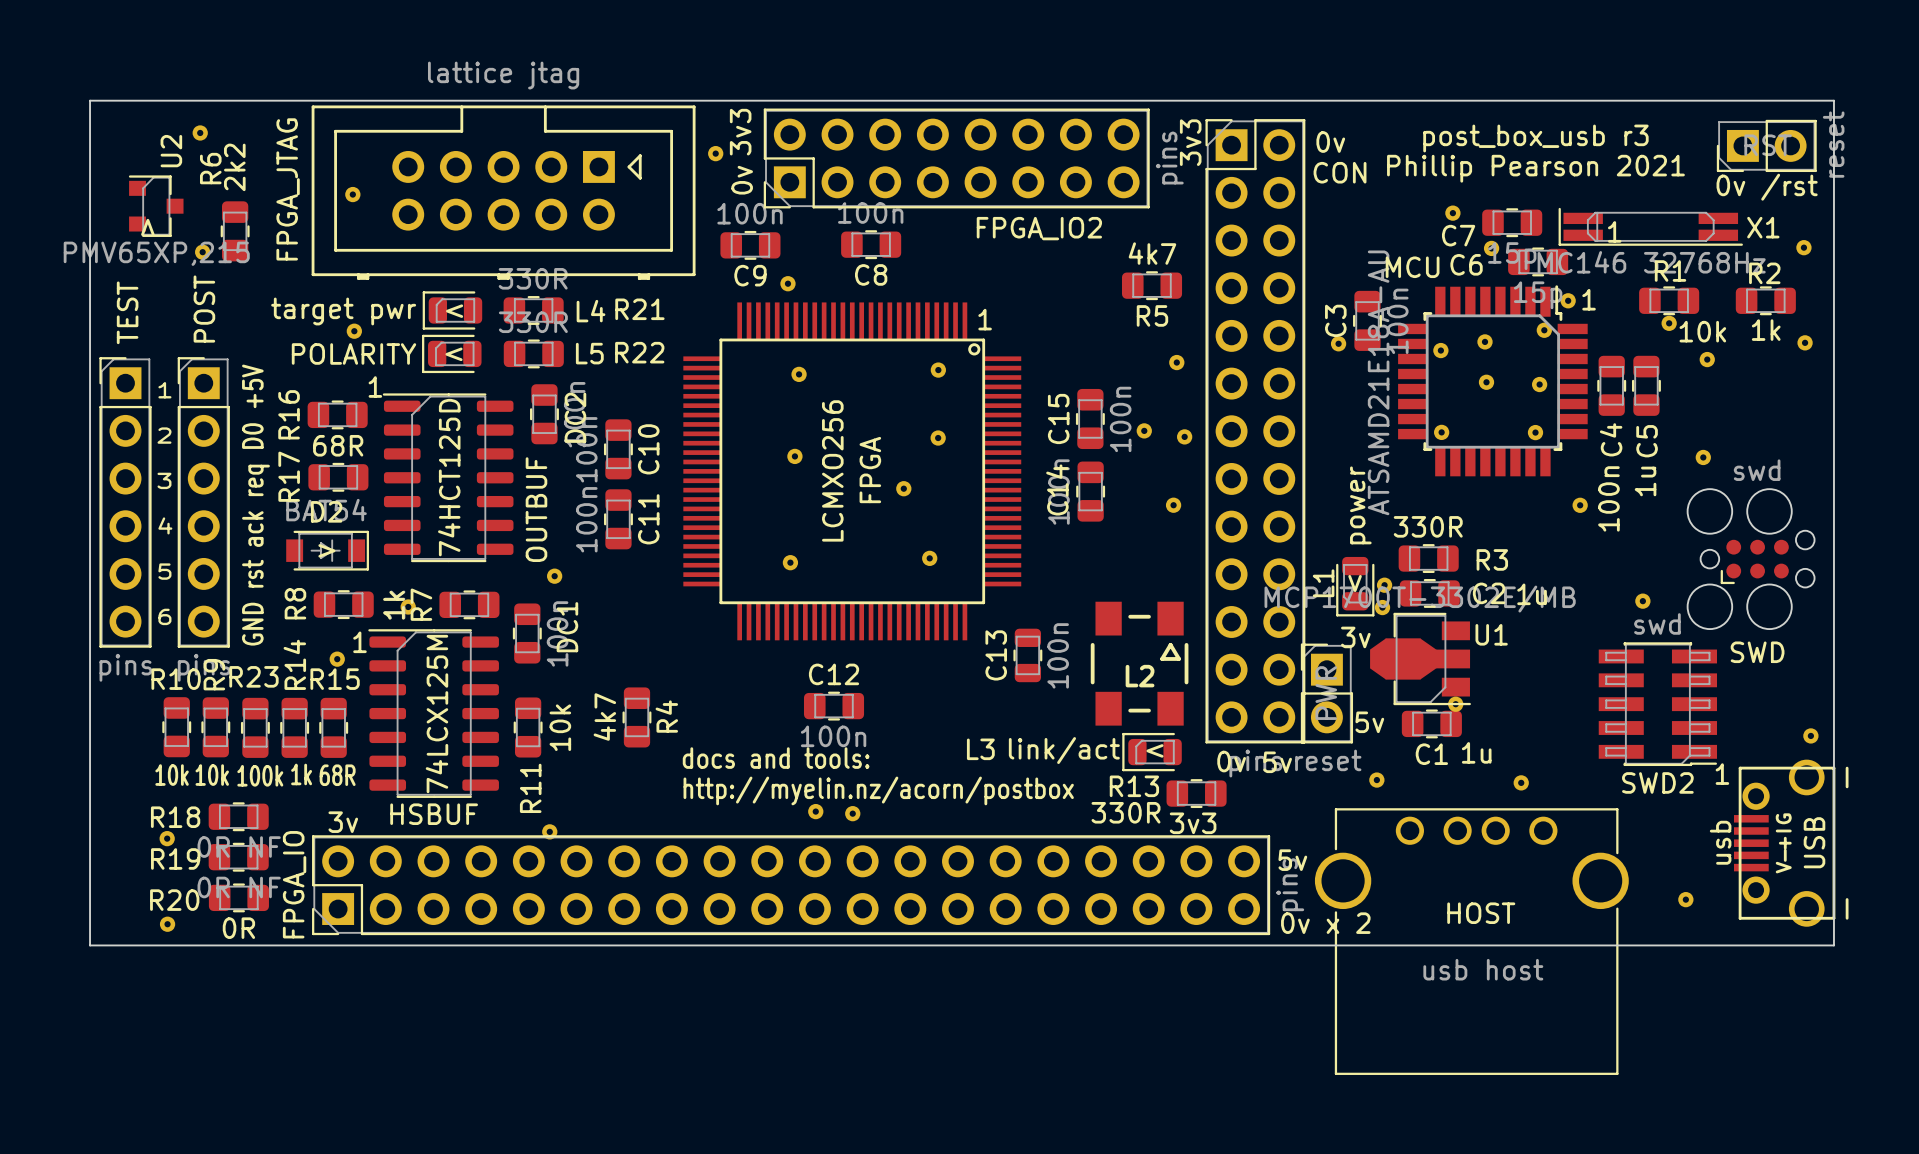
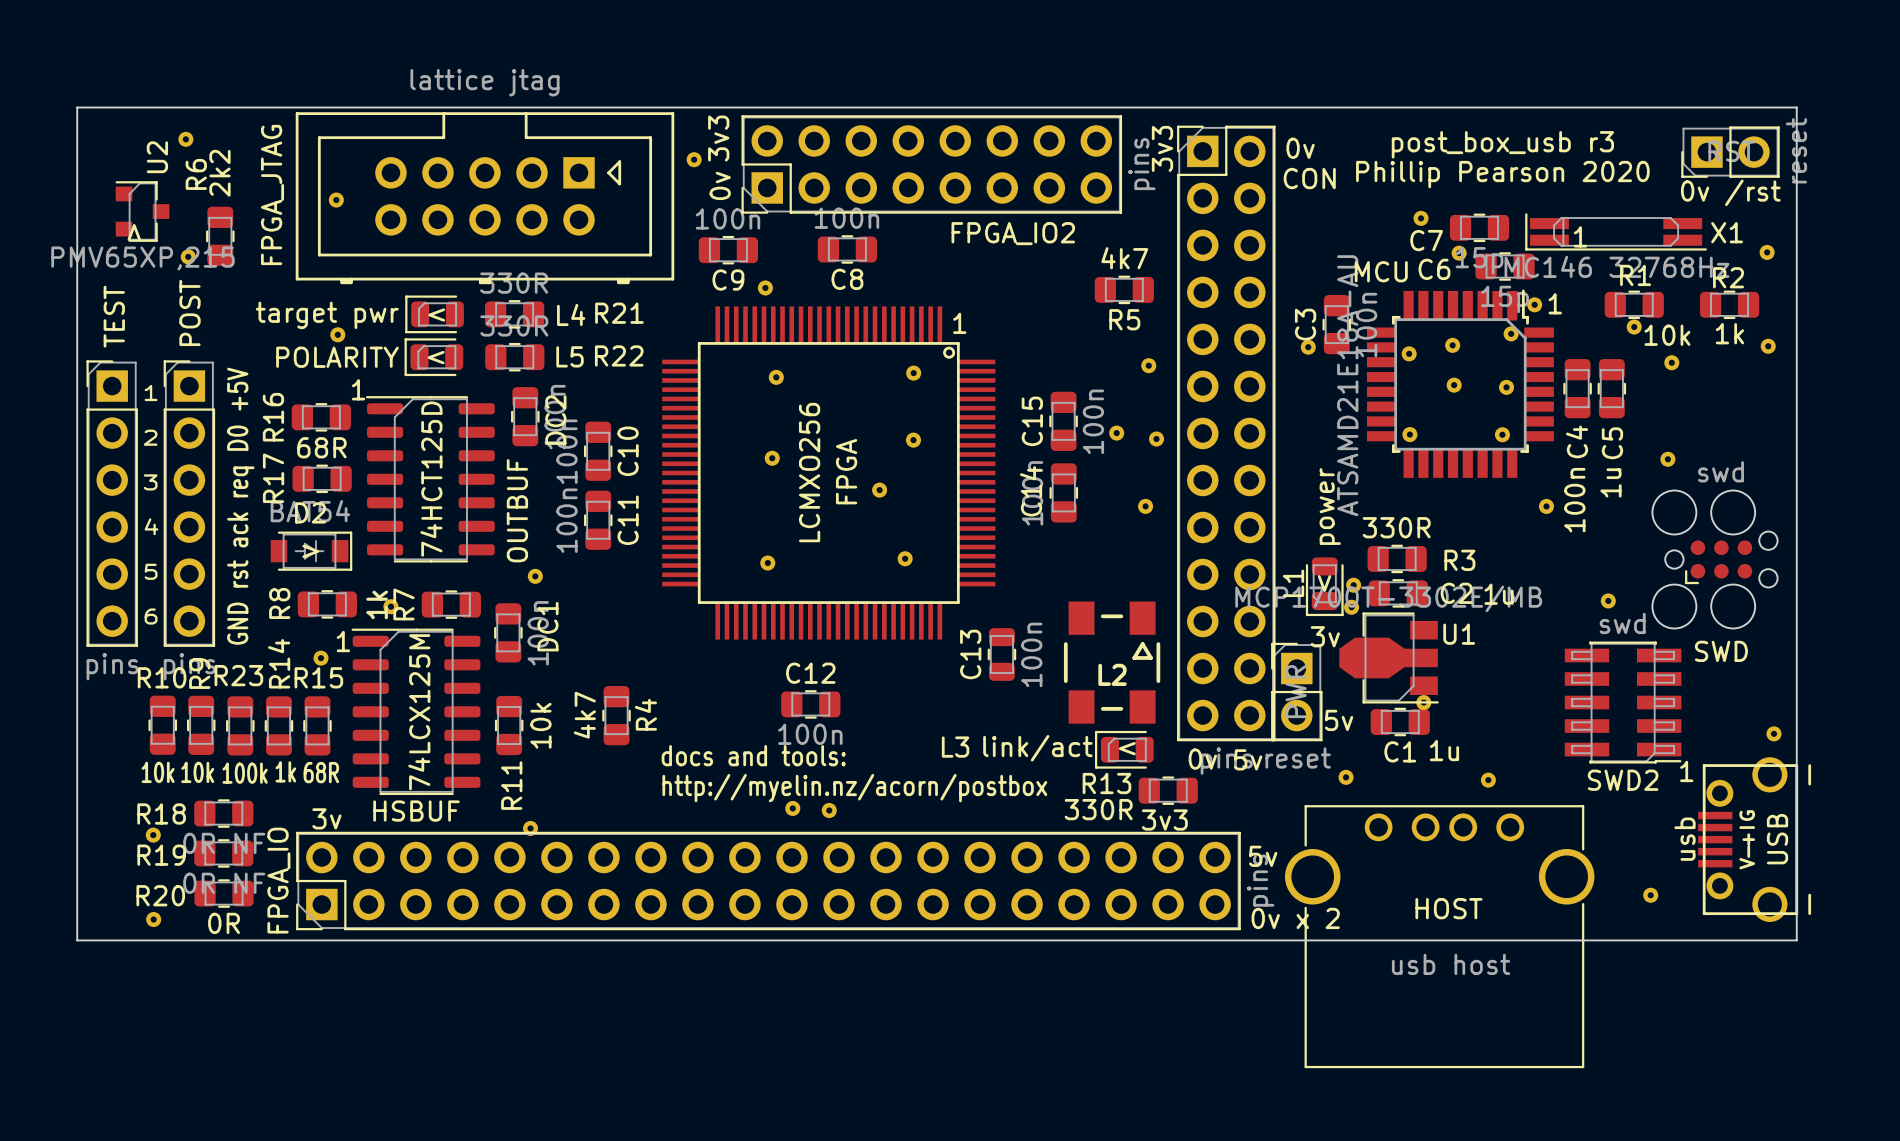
text: Phillip Pearson 2021 (1535, 168) -> Phillip Pearson 2020 (1502, 174)

